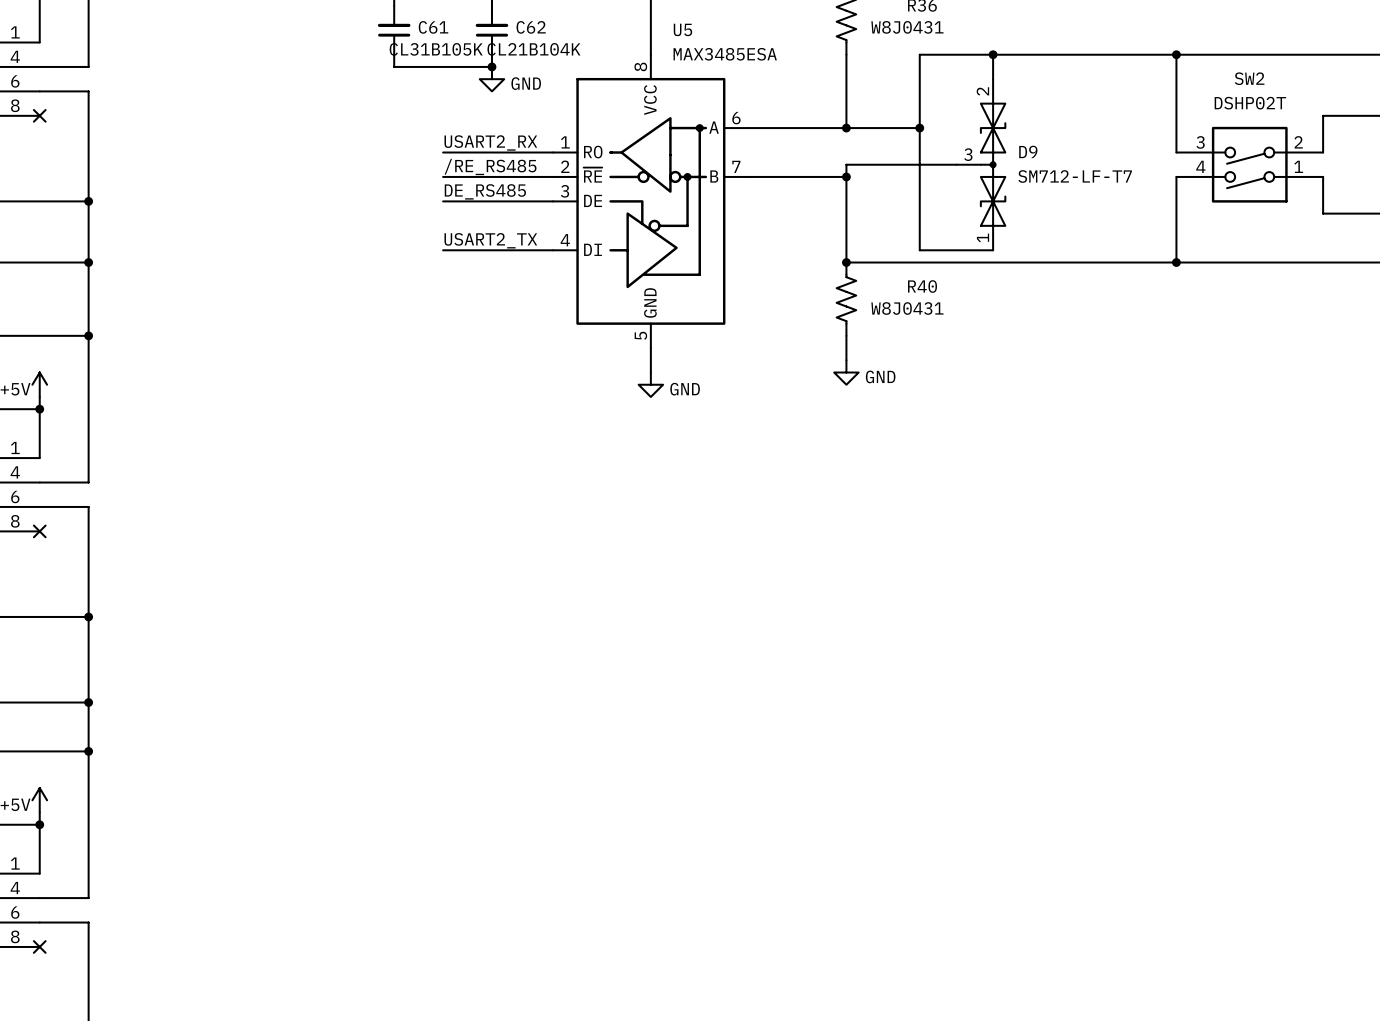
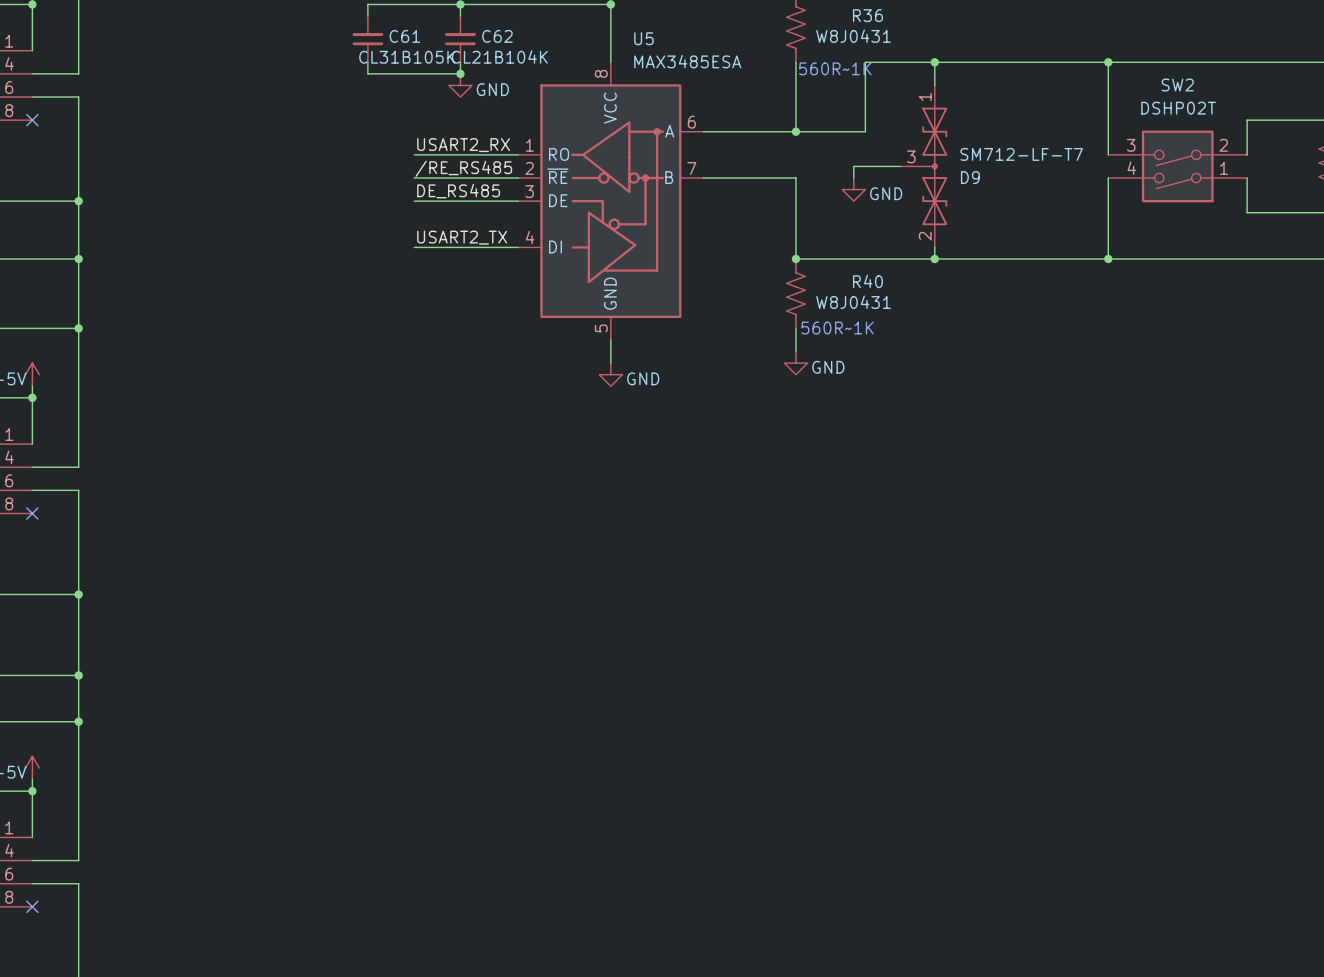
text: none -> 560R~1K (835, 68)
wire: (919, 128) (919, 250) (993, 250) -> (934, 258) (934, 247)
junction: (919, 128) -> none
wire: (907, 164) (846, 164) (846, 176) -> (853, 166) (853, 178)
D9 flip: as is (993, 164) -> up-down (934, 166)
junction: (846, 176) -> none
power symbol: none -> GND (853, 189)
junction: none -> (934, 258)
text: none -> 560R~1K (837, 328)

